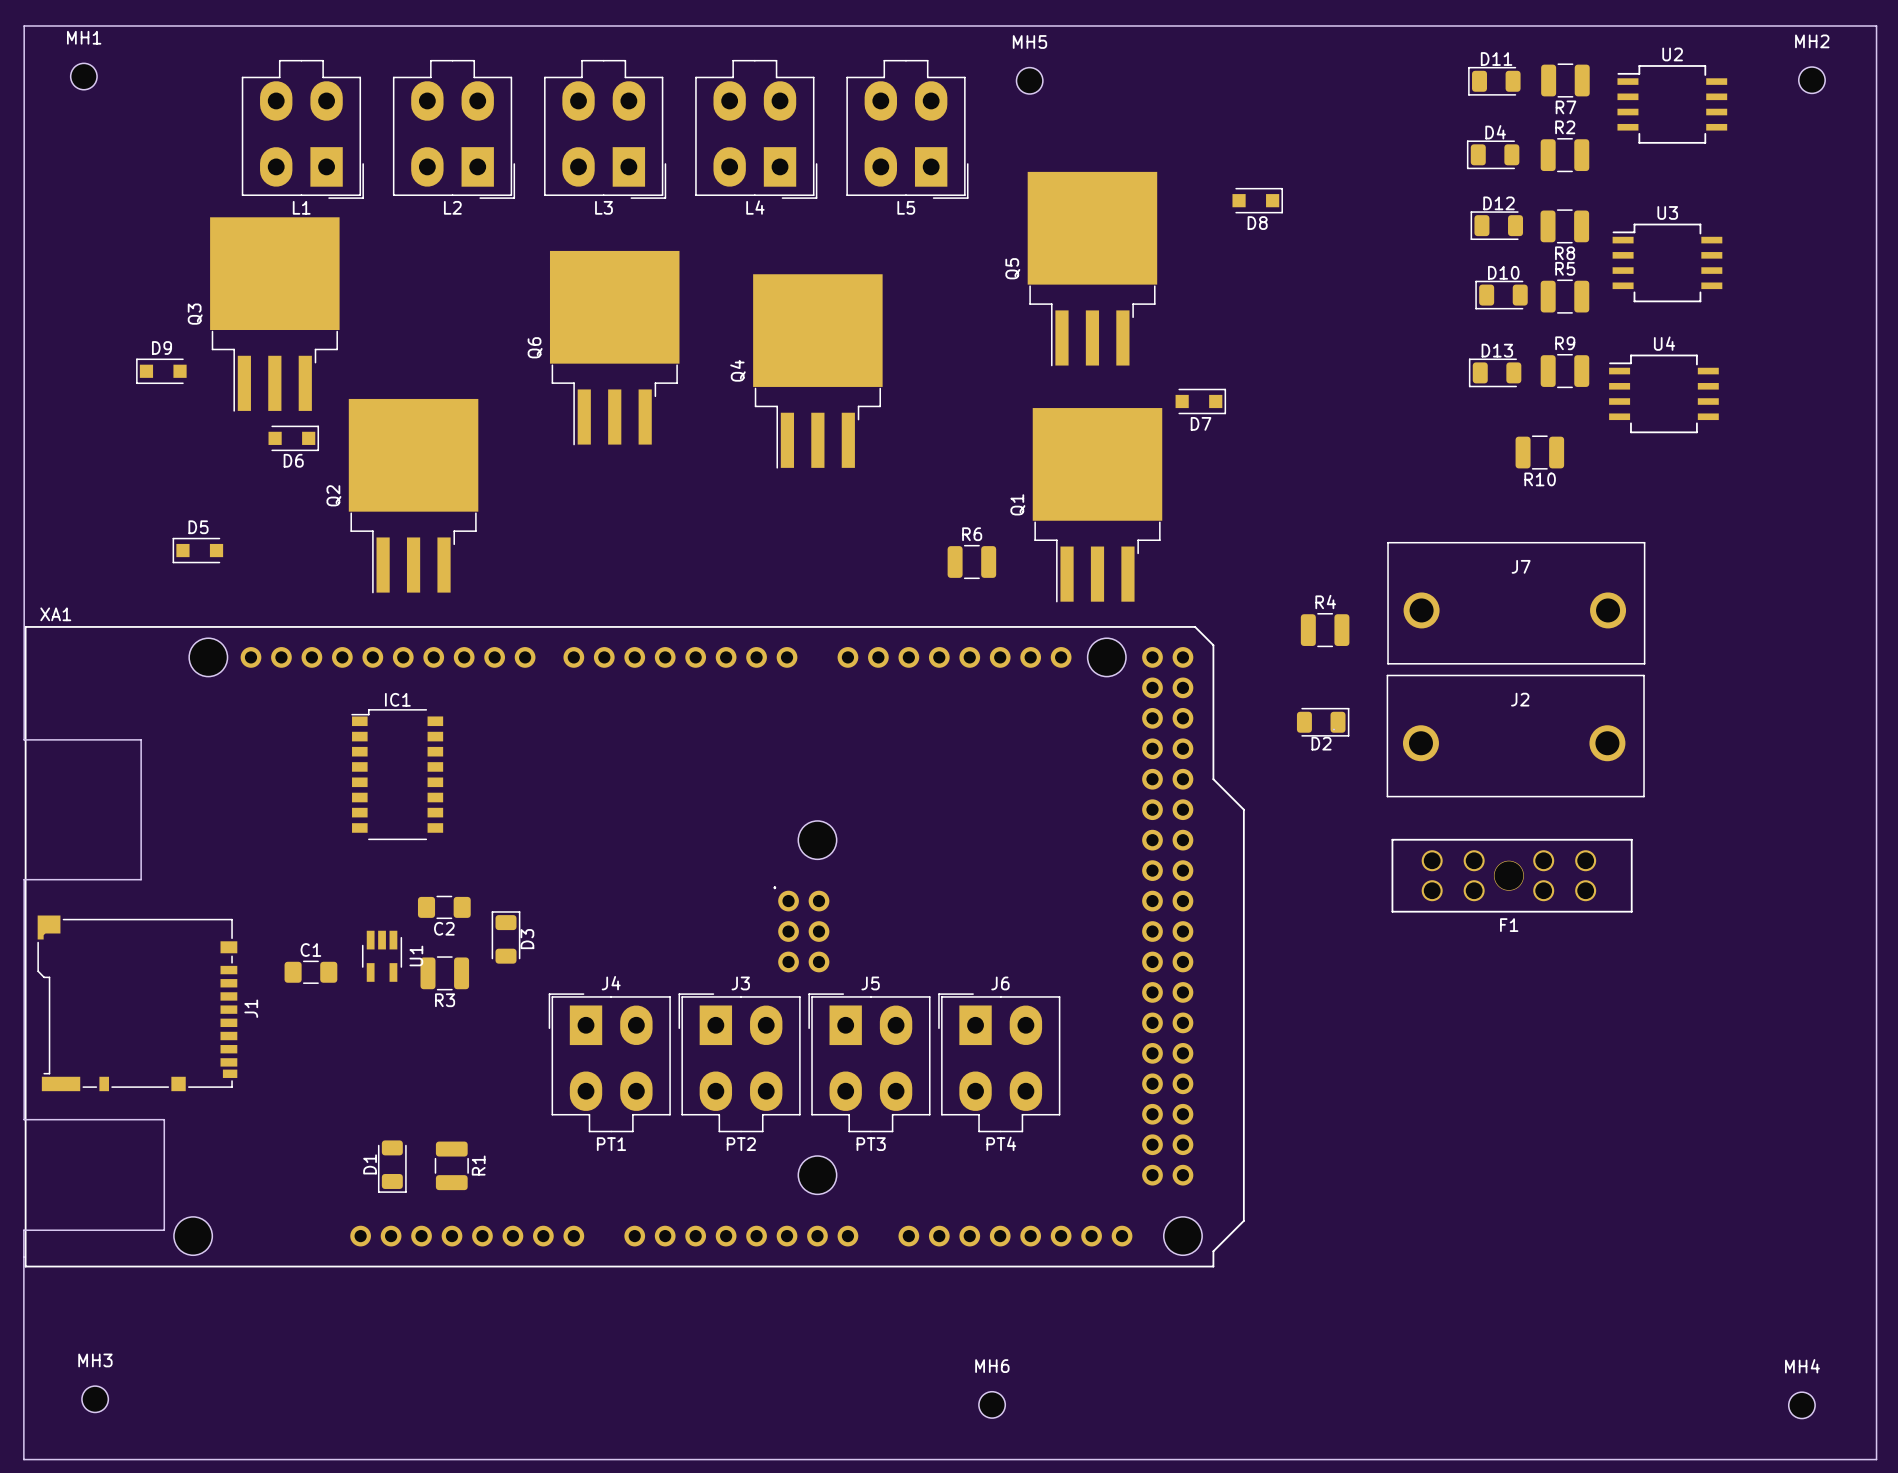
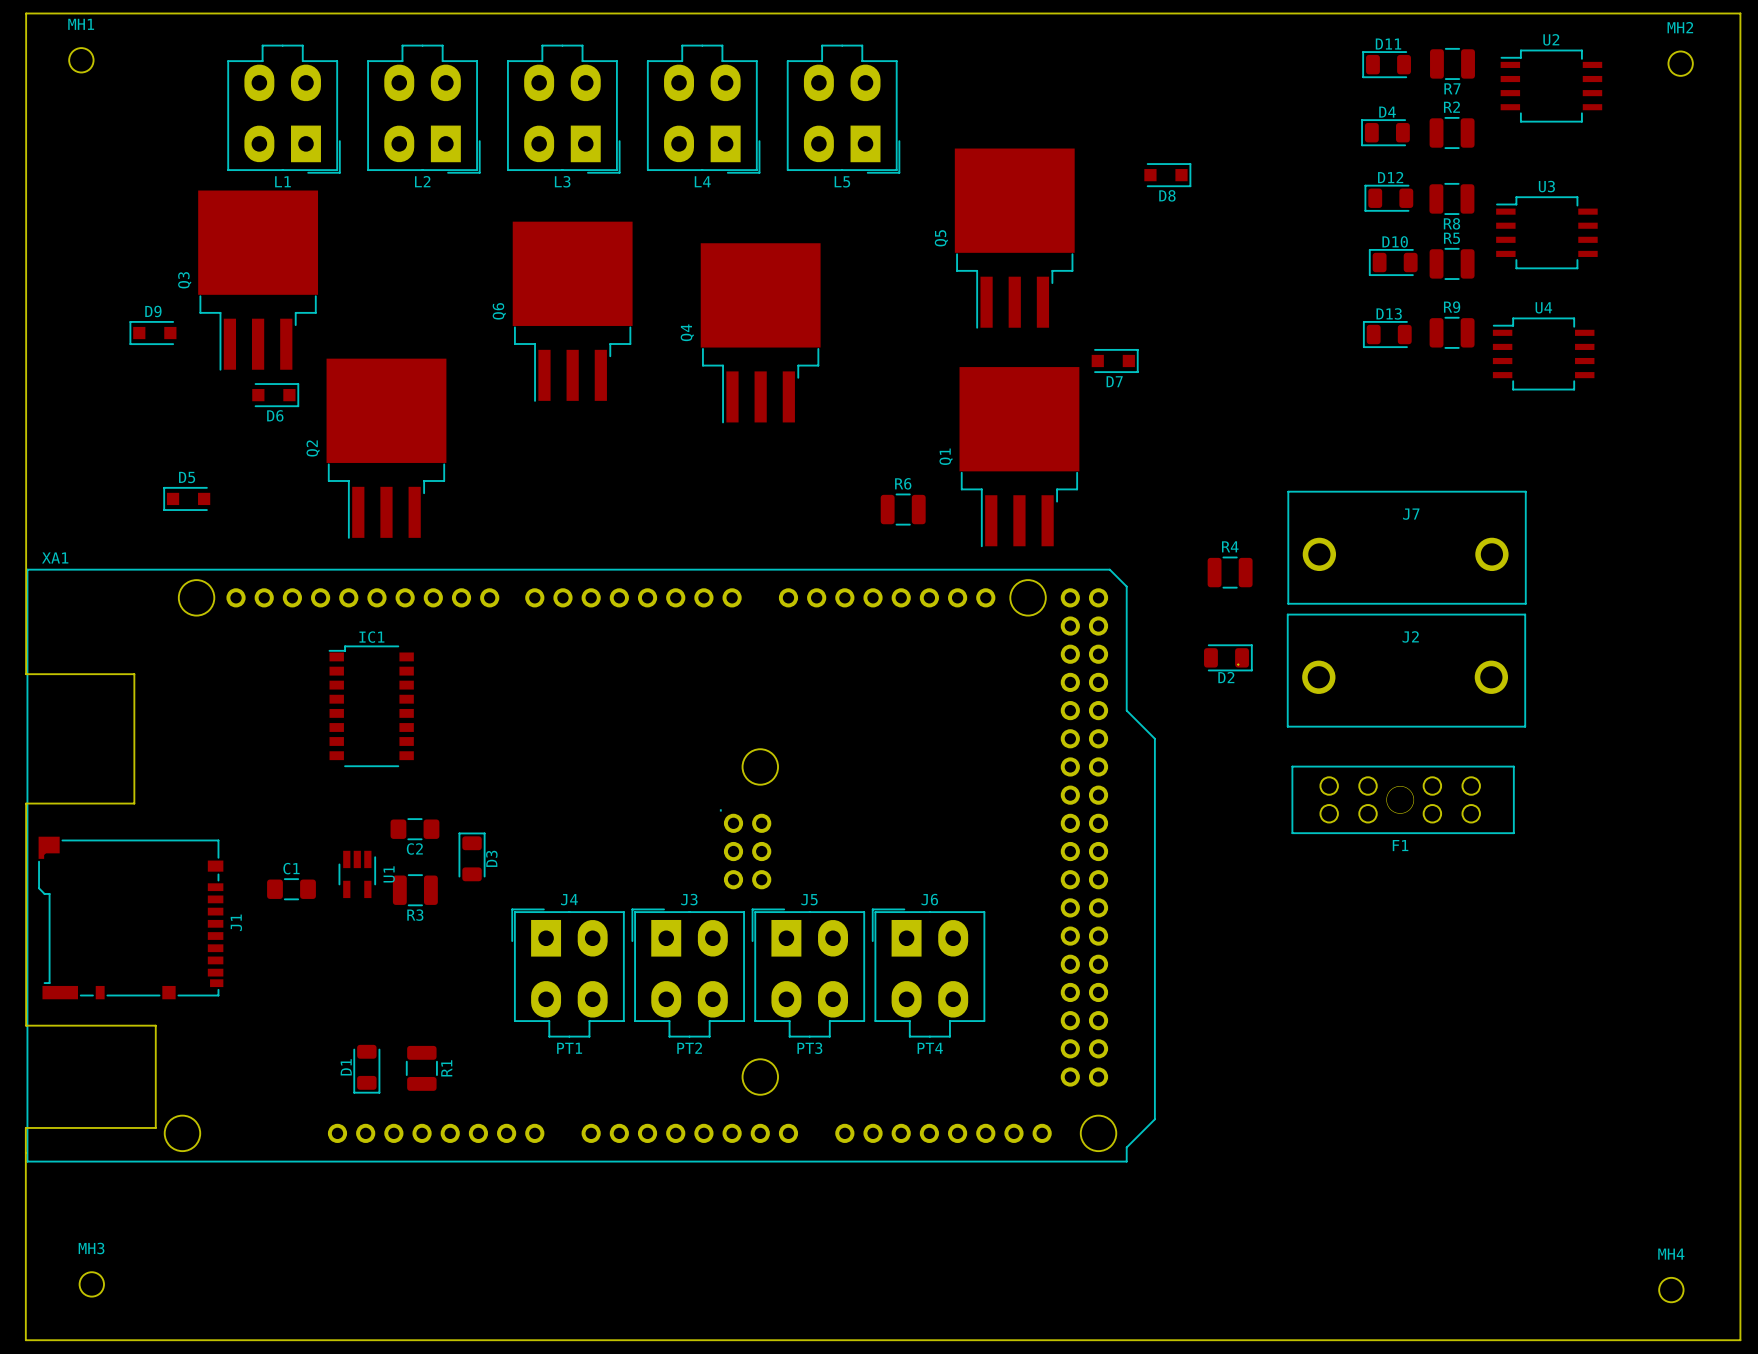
MH5: (1029, 80) -> none
R10: (1539, 452) -> none
MH6: (992, 1404) -> none

